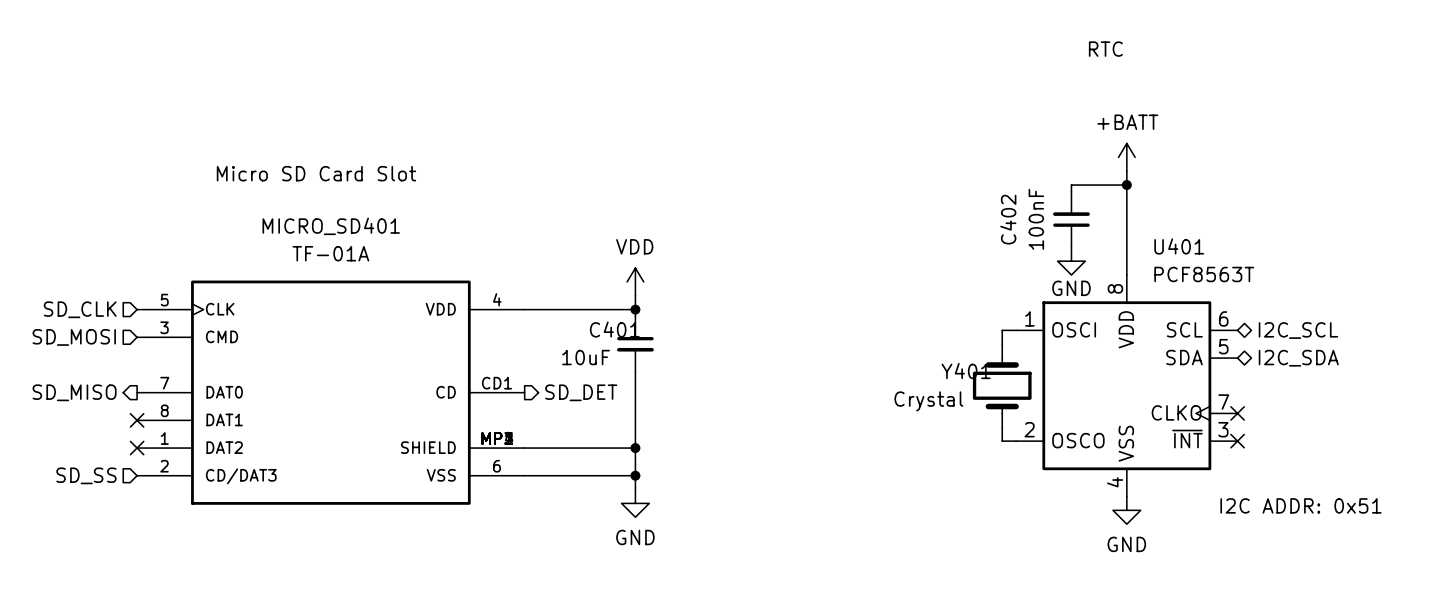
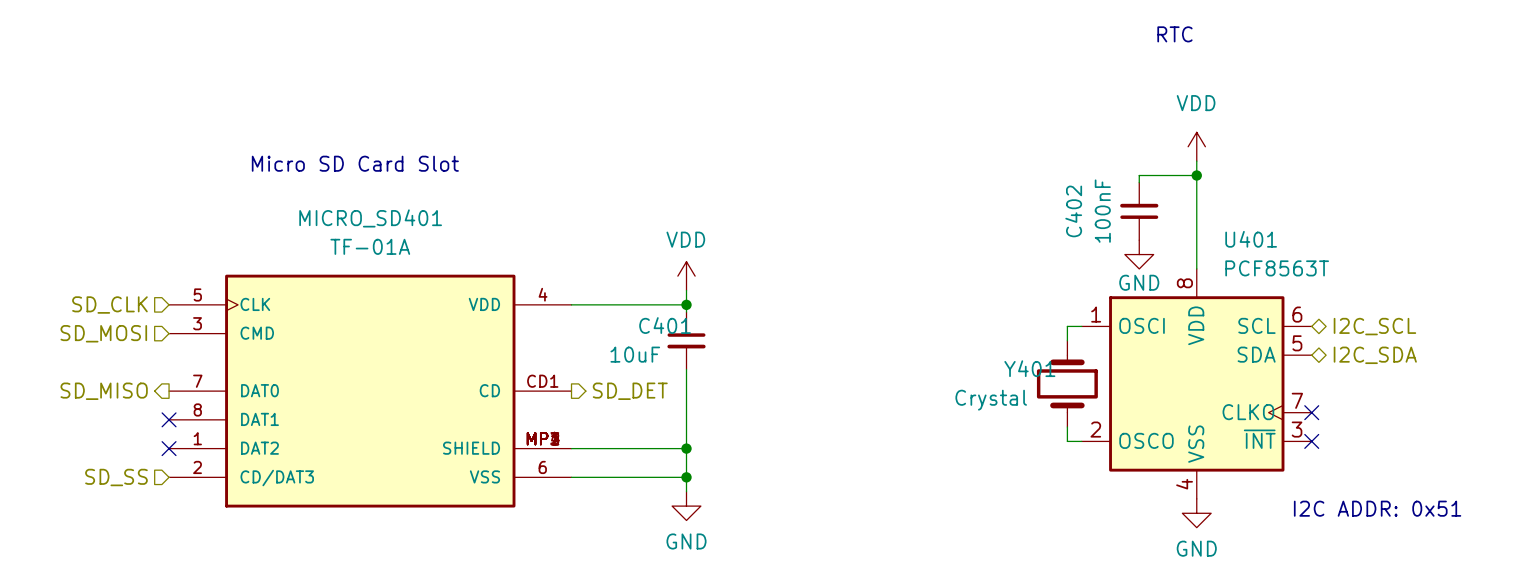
power symbol: +BATT (1126, 157) -> VDD (1196, 146)

